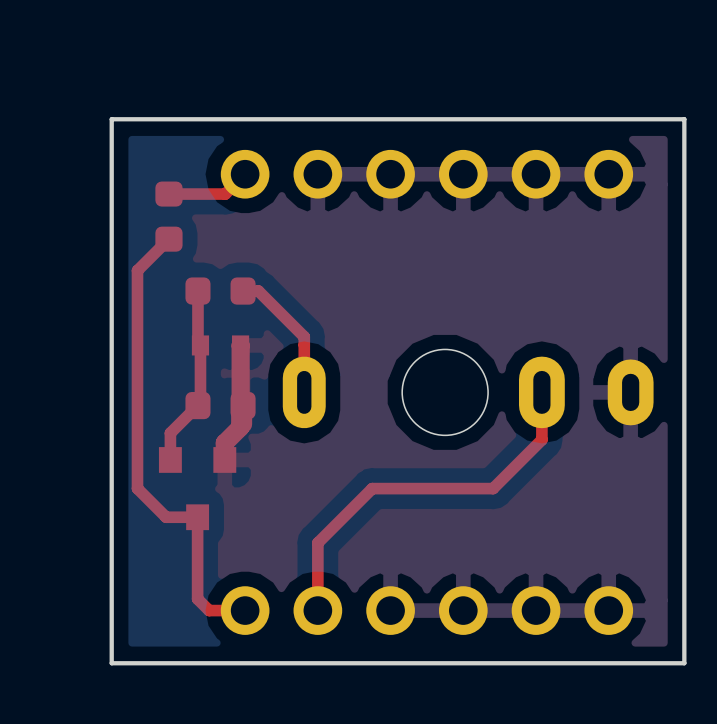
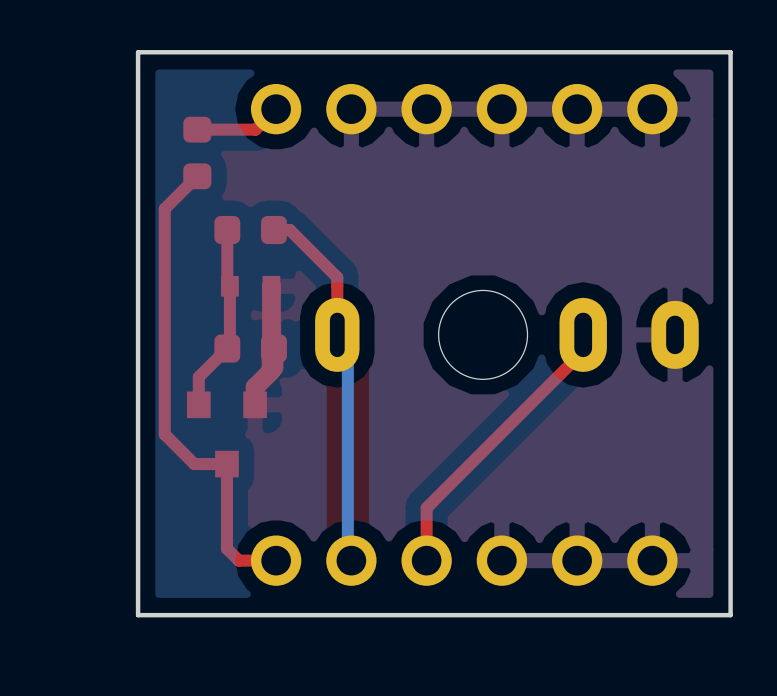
bottom track: none -> (337, 334) (347, 345) (347, 557) (351, 560)
top track: (541, 408) (541, 439) (493, 488) (372, 488) (317, 543) (317, 610) -> (583, 351) (426, 507) (426, 560)

